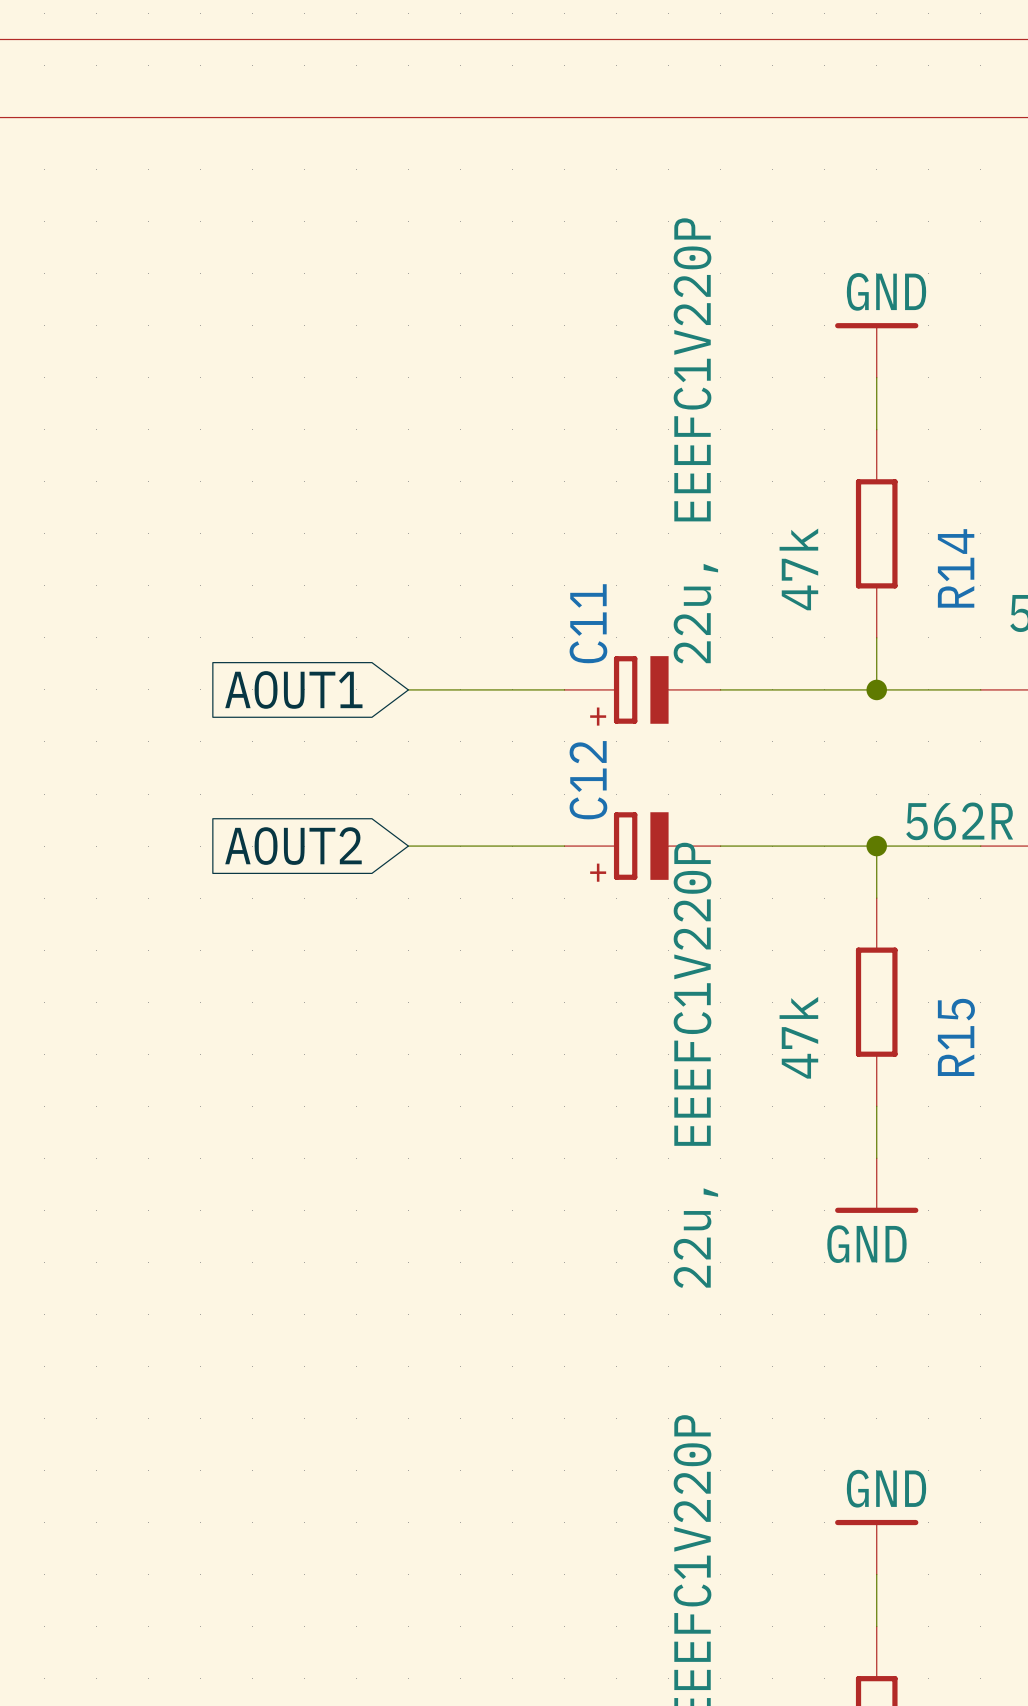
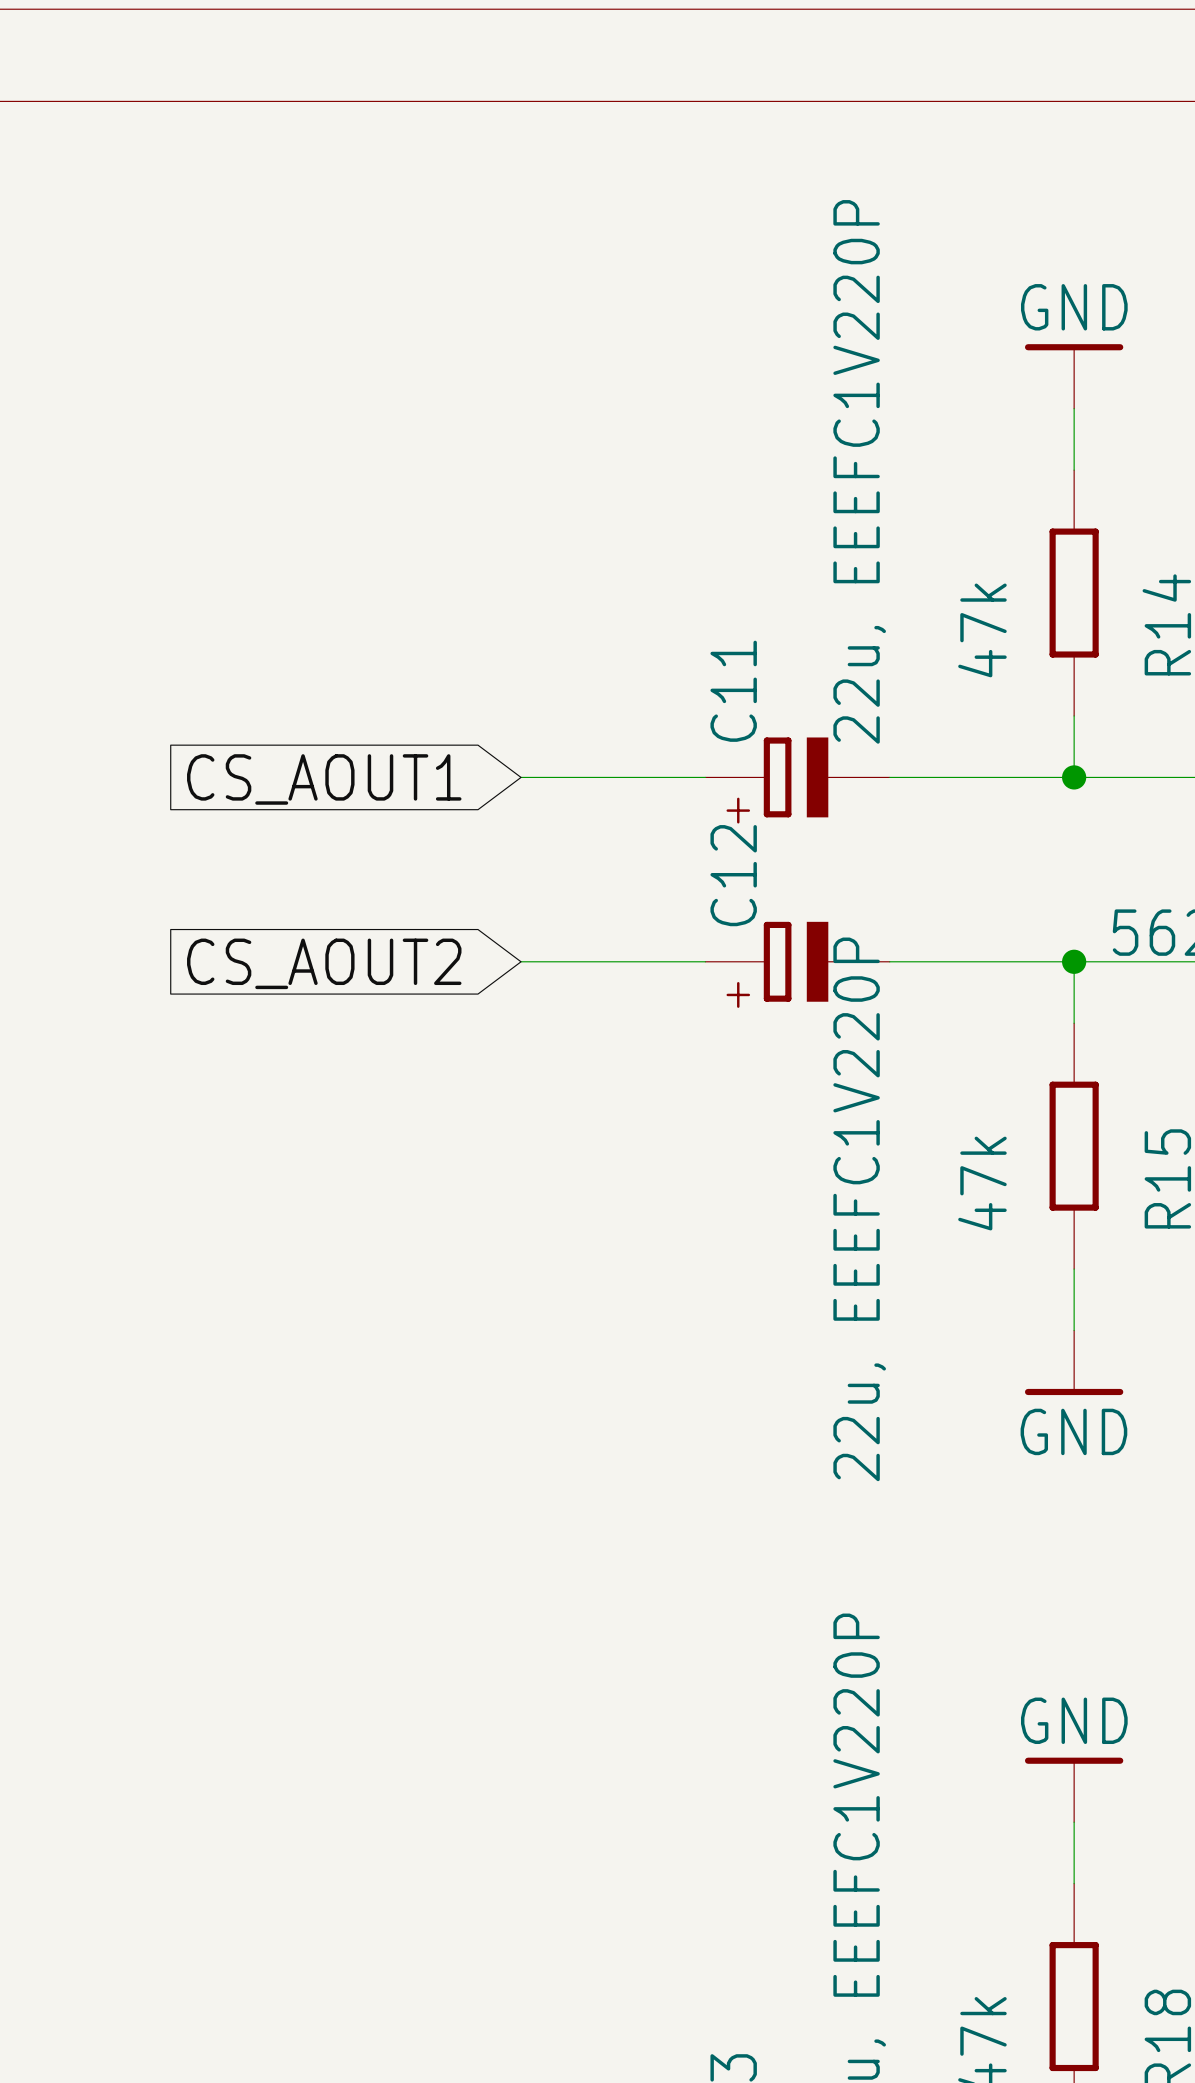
global label: AOUT1 (293, 689) -> CS_AOUT1 (324, 779)
global label: AOUT2 (293, 846) -> CS_AOUT2 (324, 963)

